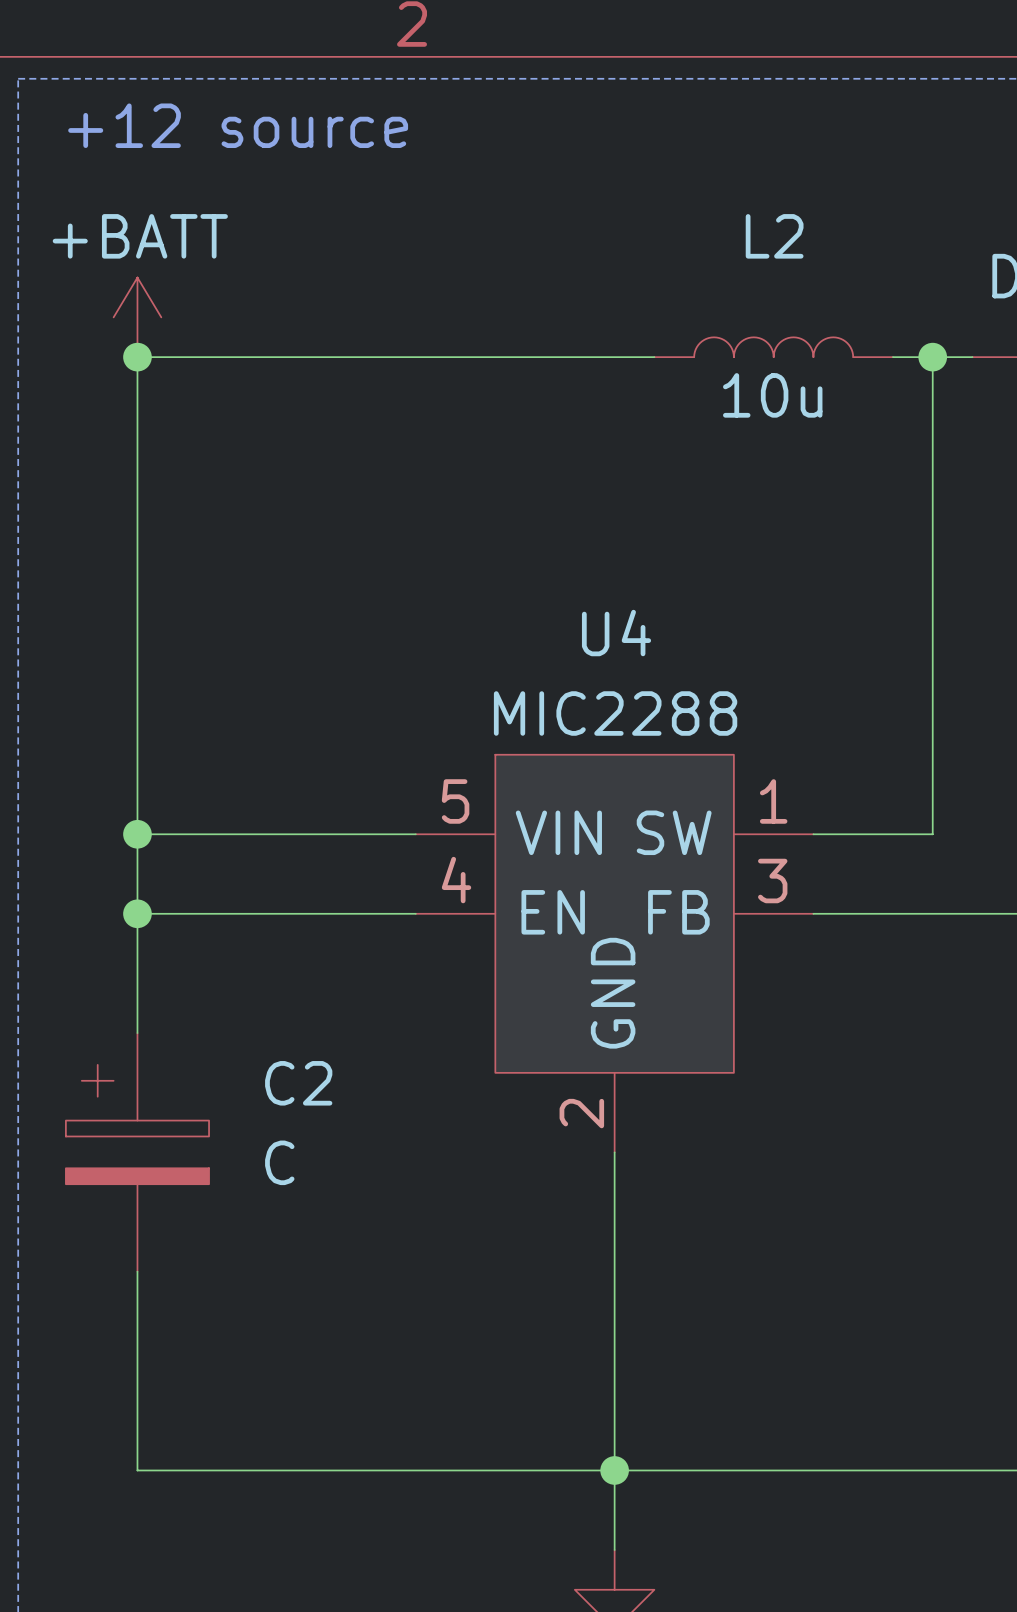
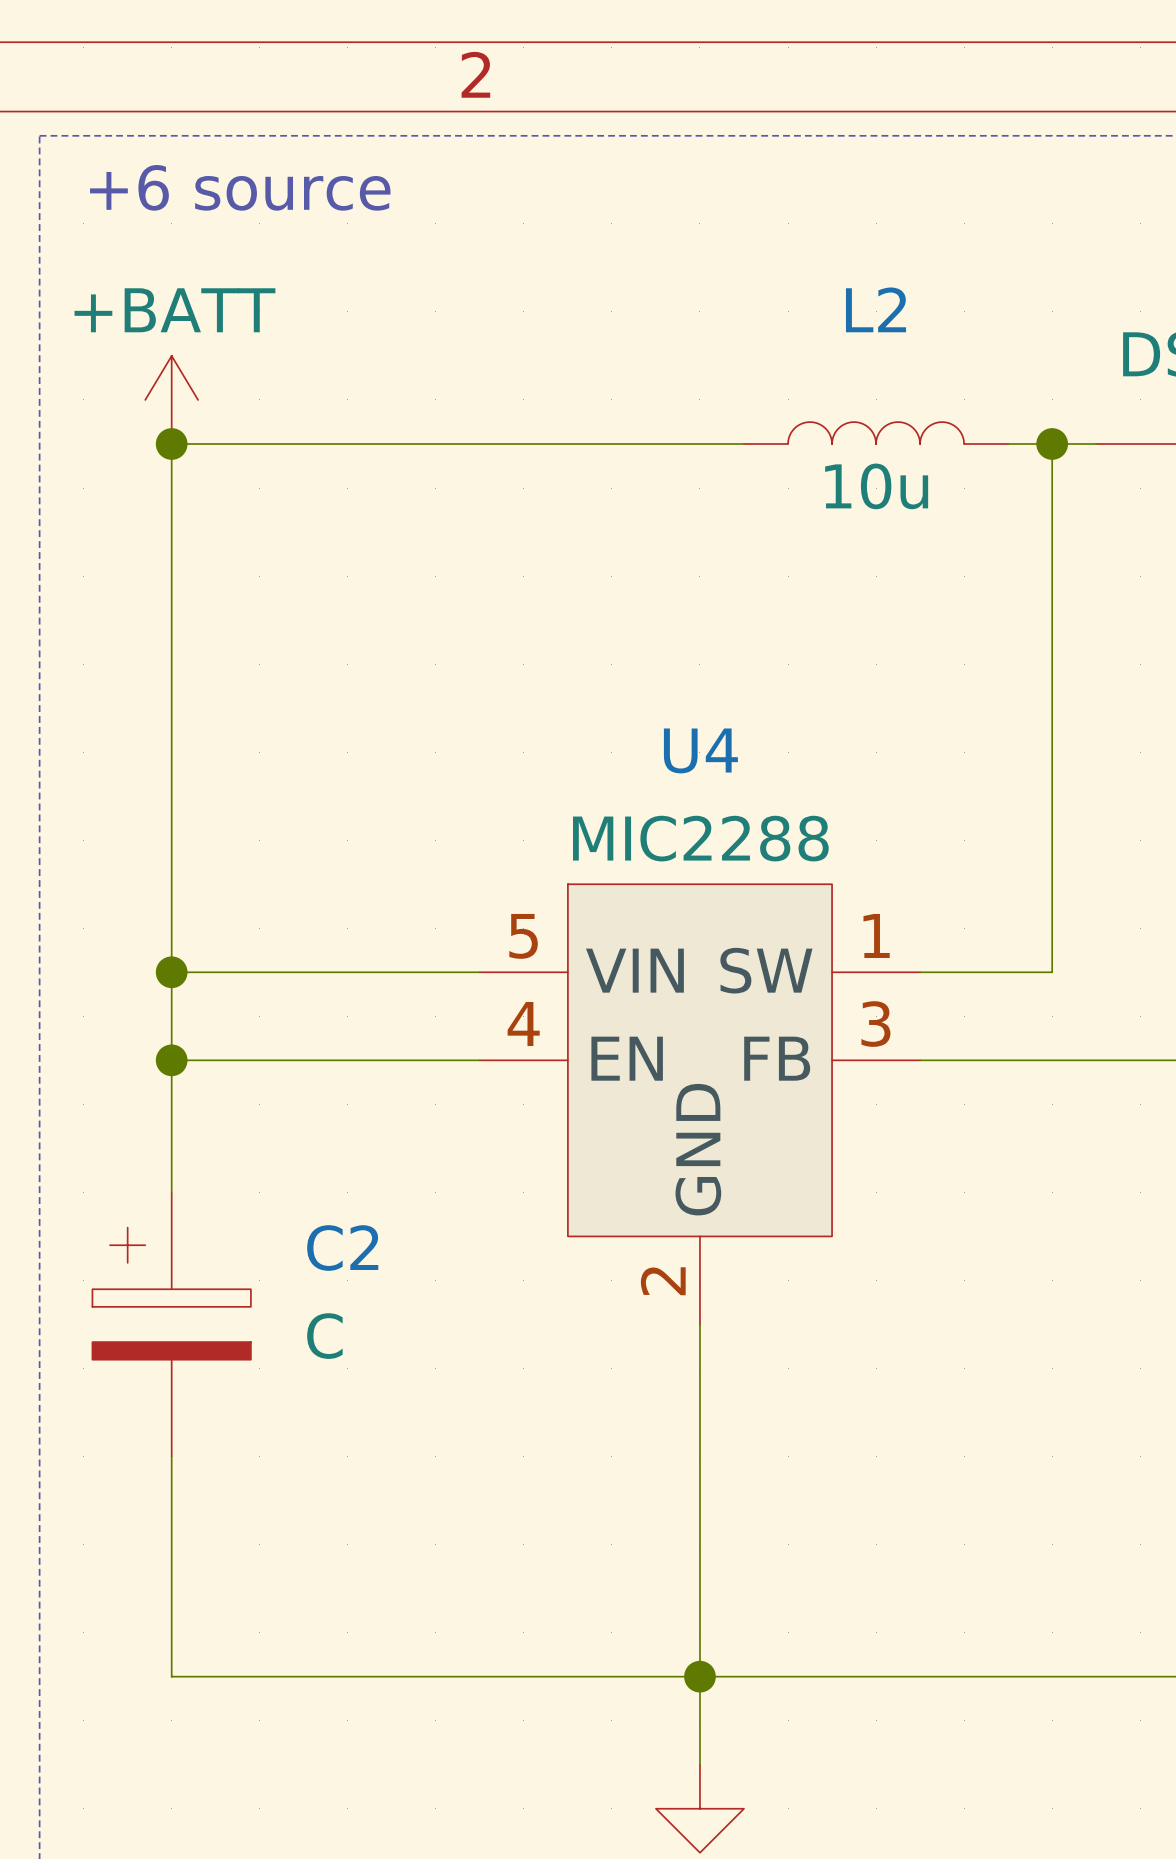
text: +12 source (238, 125) -> +6 source (240, 187)

